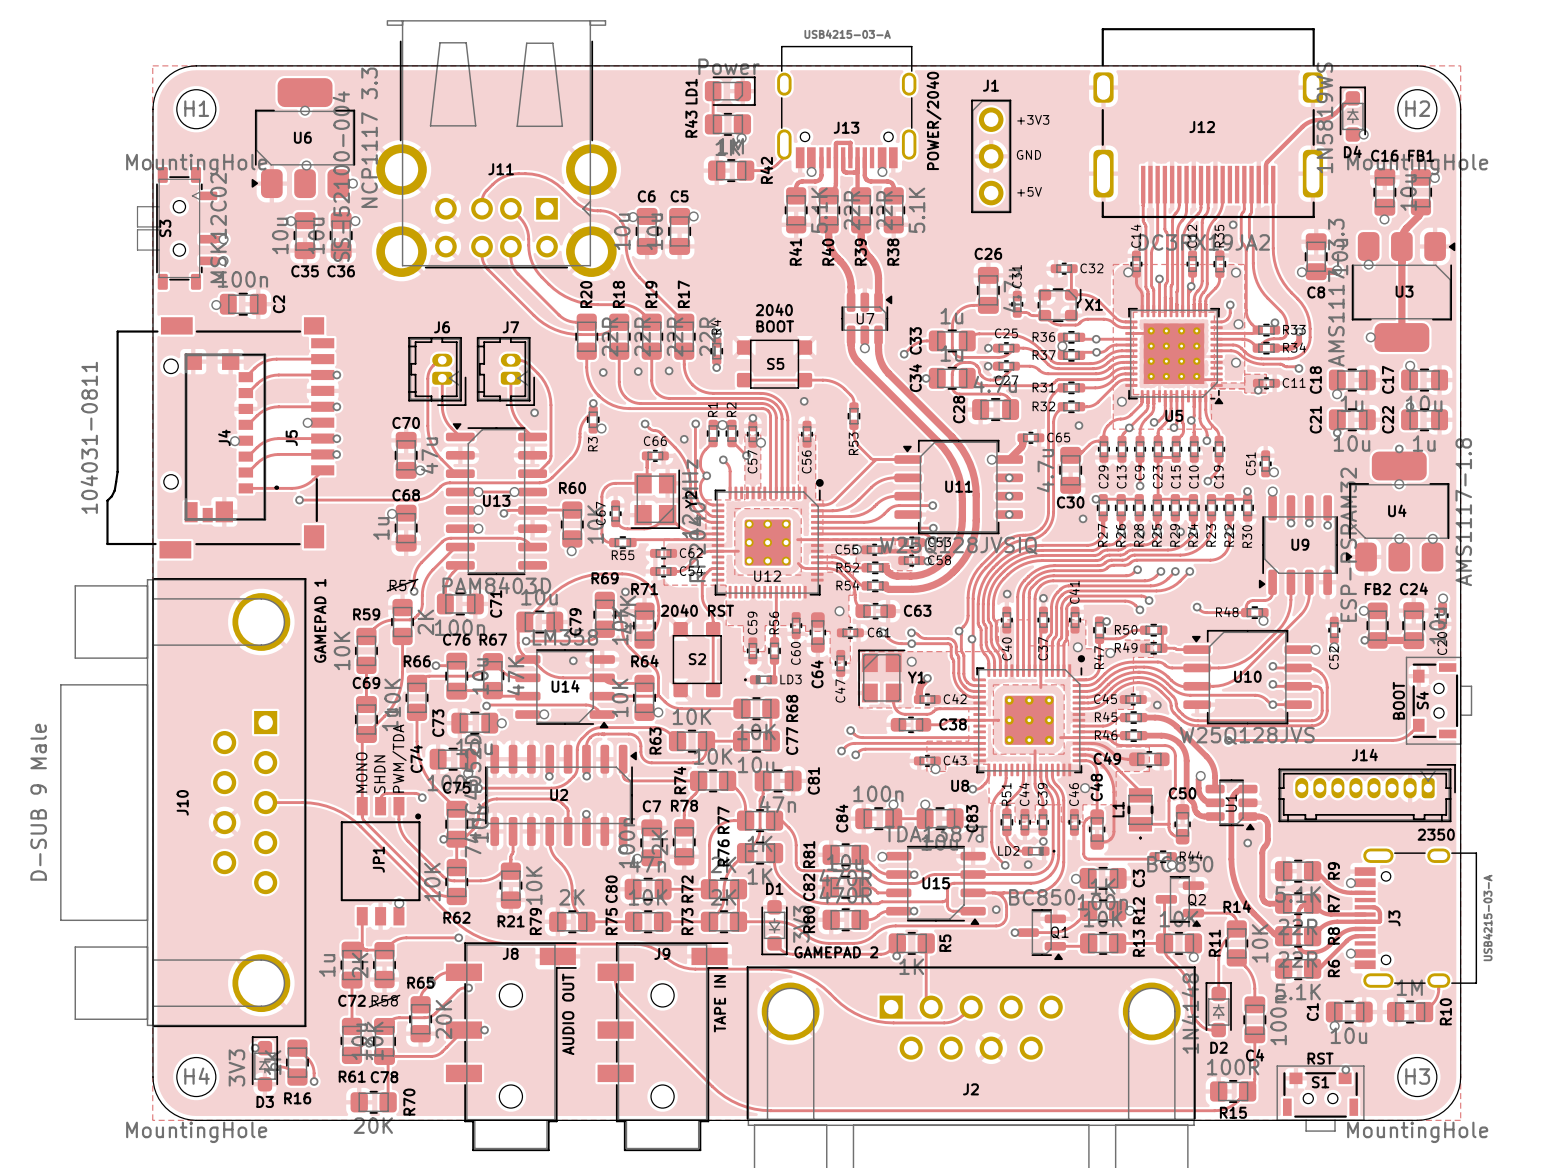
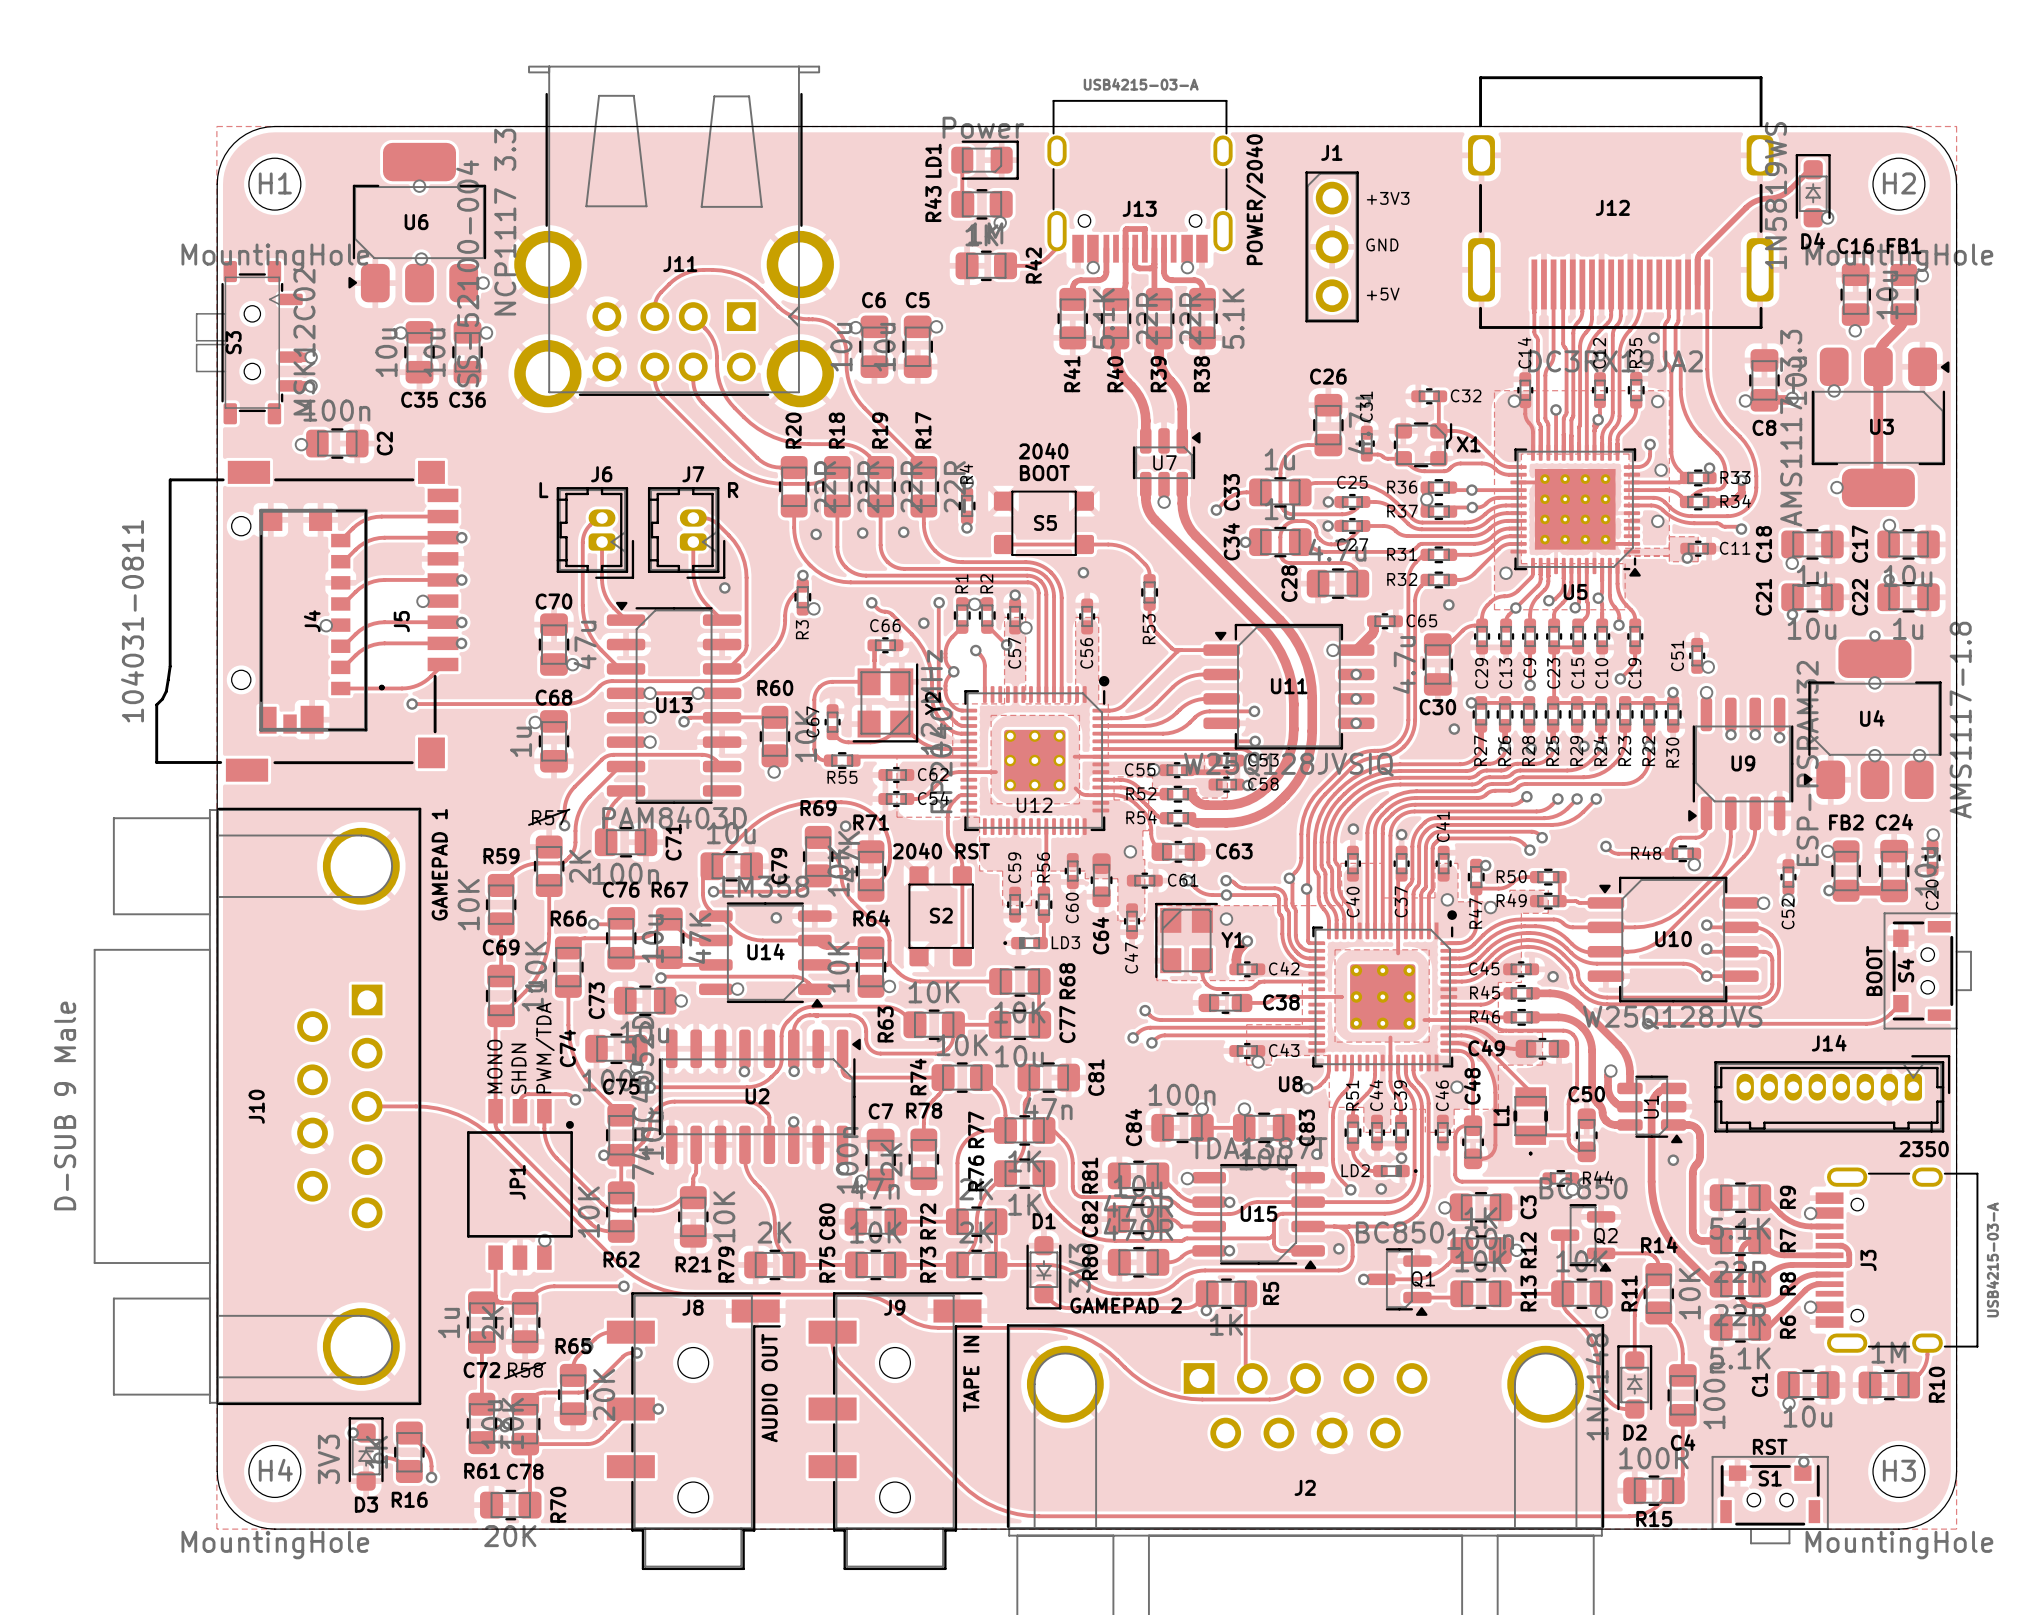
text: none -> L (543, 490)
text: none -> R (733, 490)

